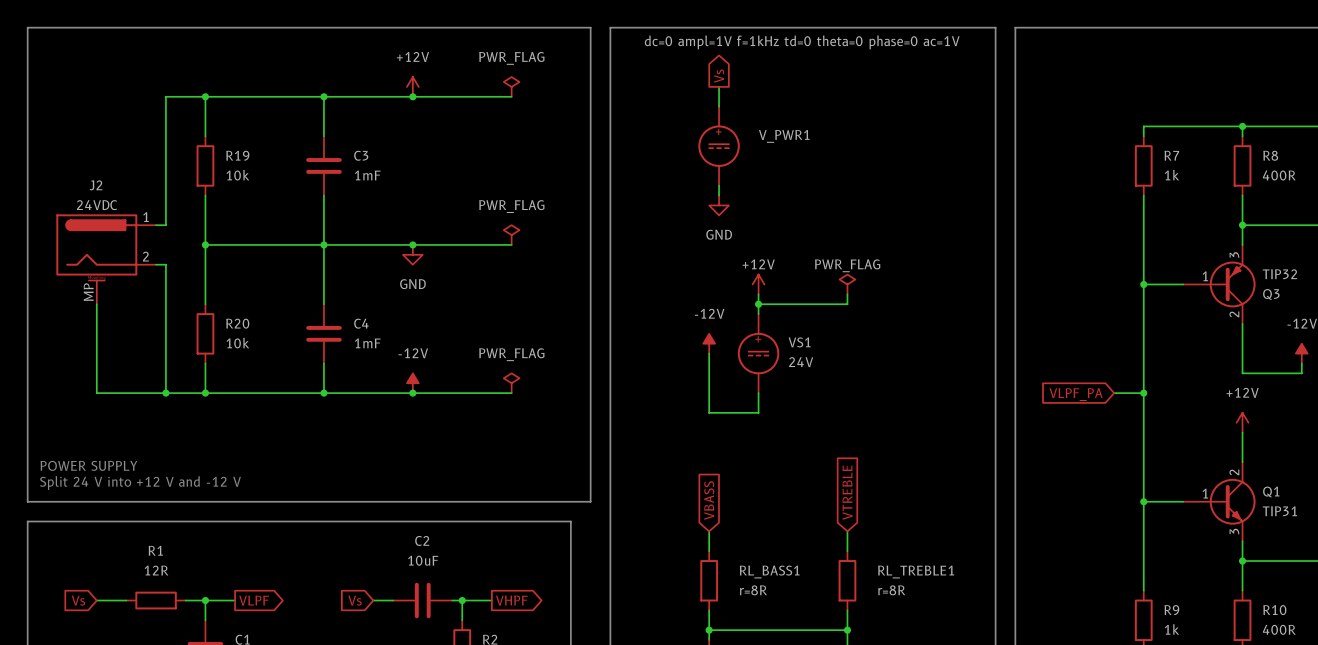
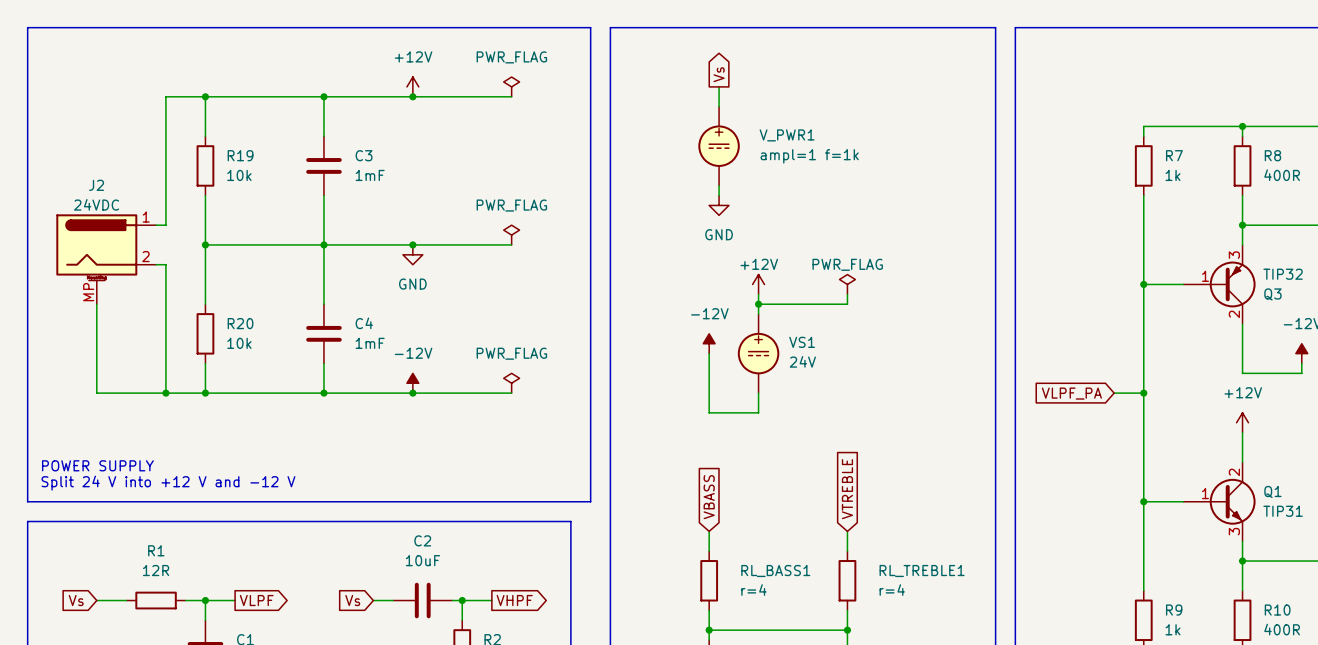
V_PWR1 text: dc=0 ampl=1V f=1kHz td=0 theta=0 phase=0 ac=1V (802, 42) -> none
V_PWR1 value: none -> ampl=1 f=1k (809, 156)
RL_BASS1 value: r=8R (753, 590) -> r=4 (753, 590)
RL_TREBLE1 value: r=8R (891, 590) -> r=4 (892, 590)

